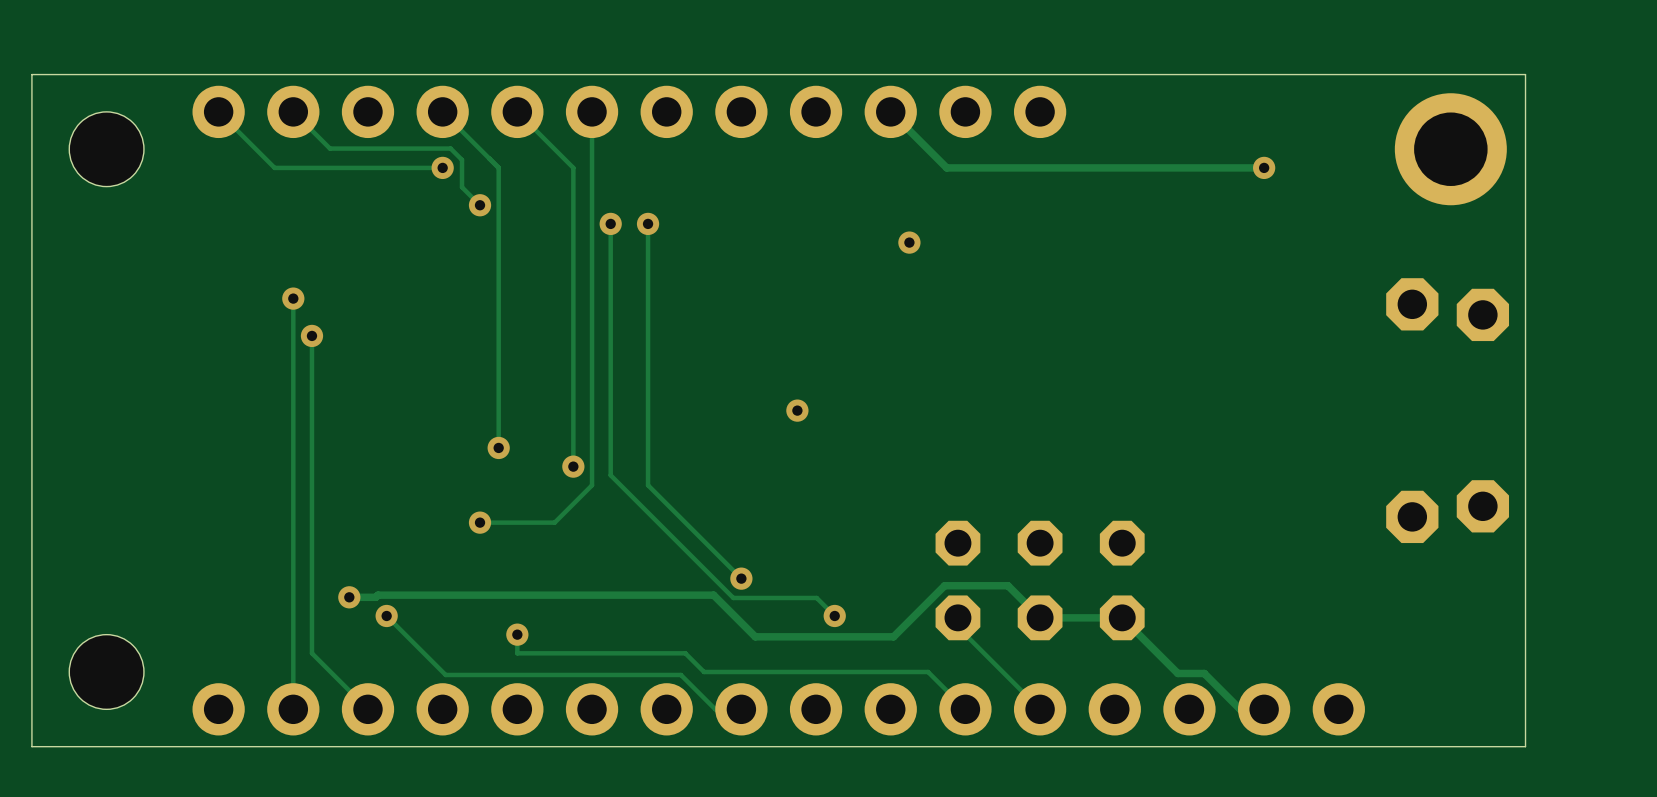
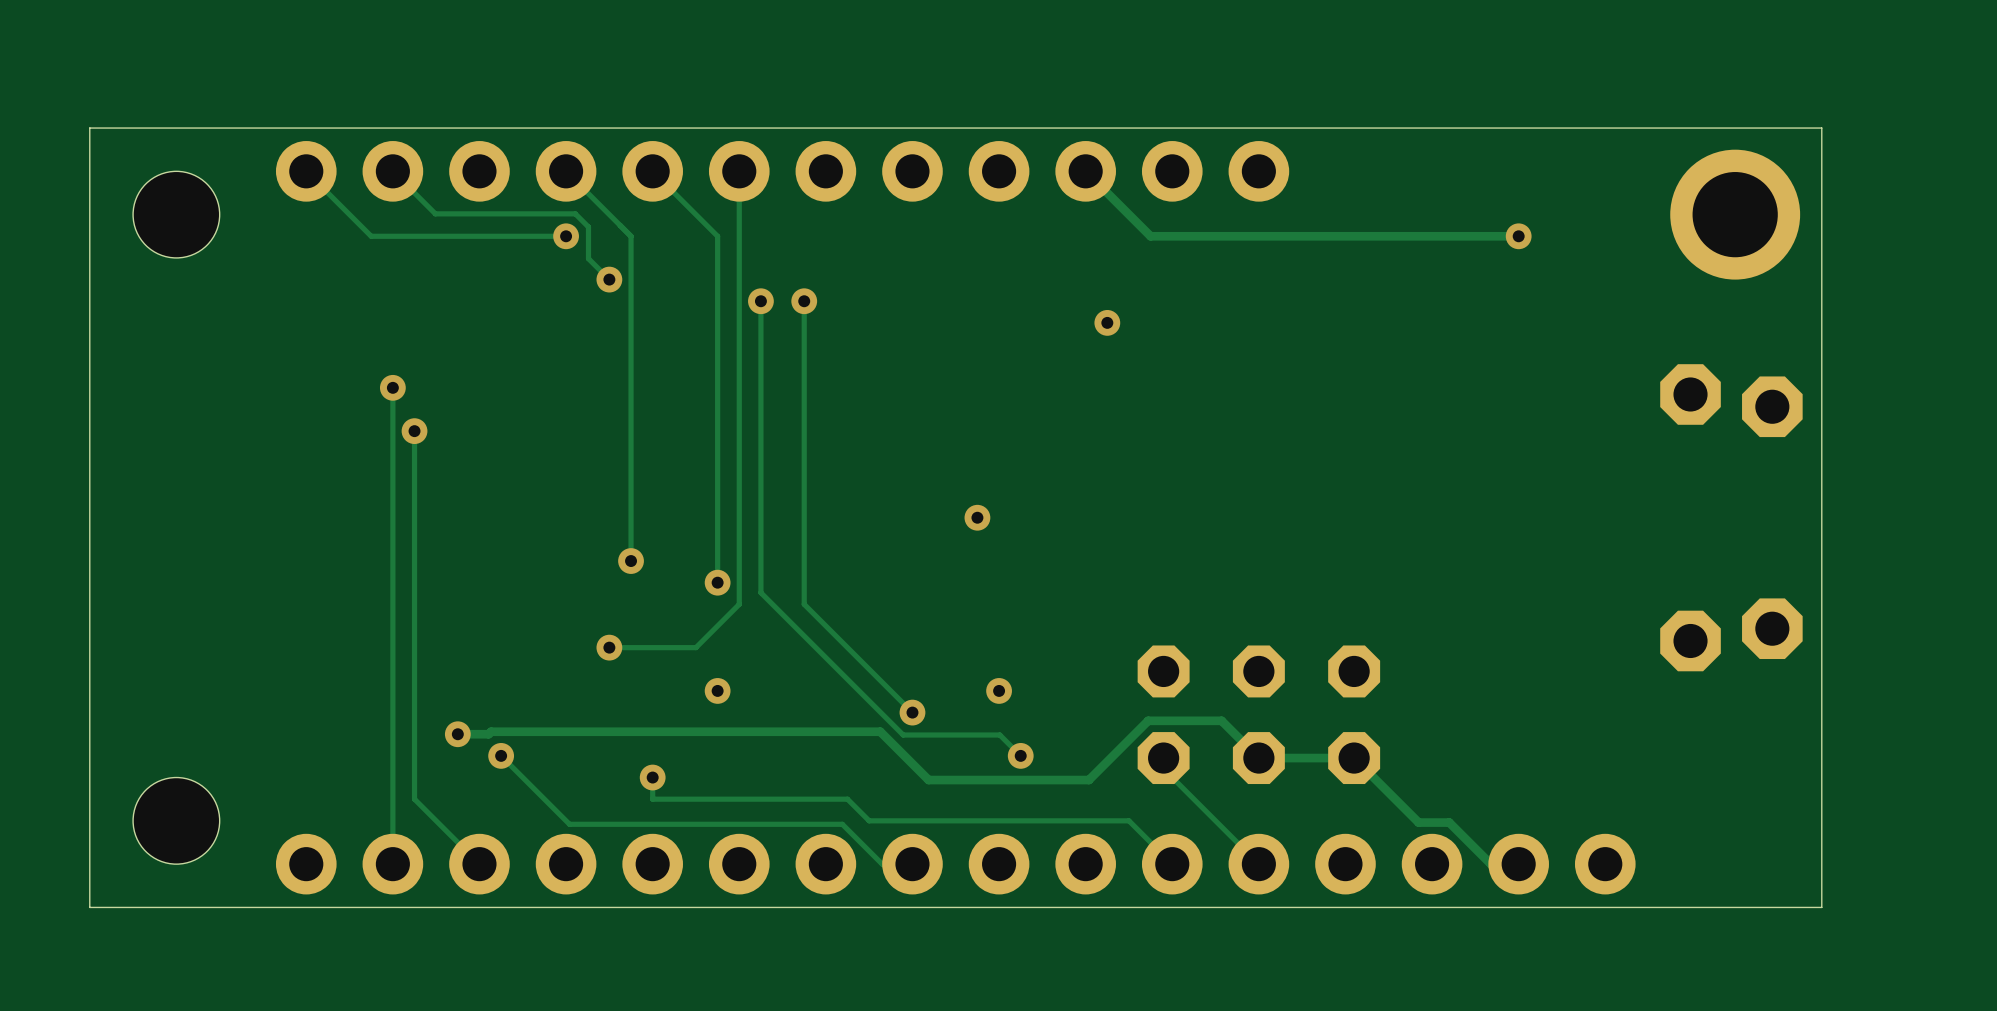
via: none -> (717, 690)
via: none -> (999, 690)

